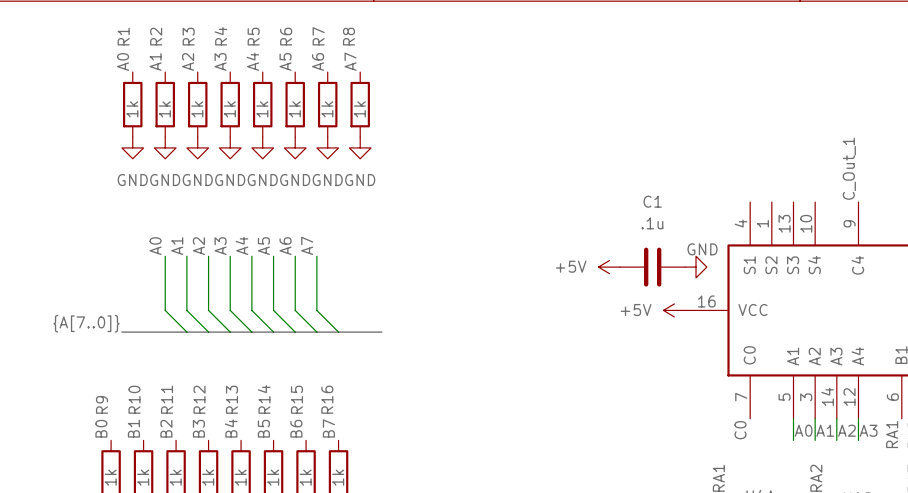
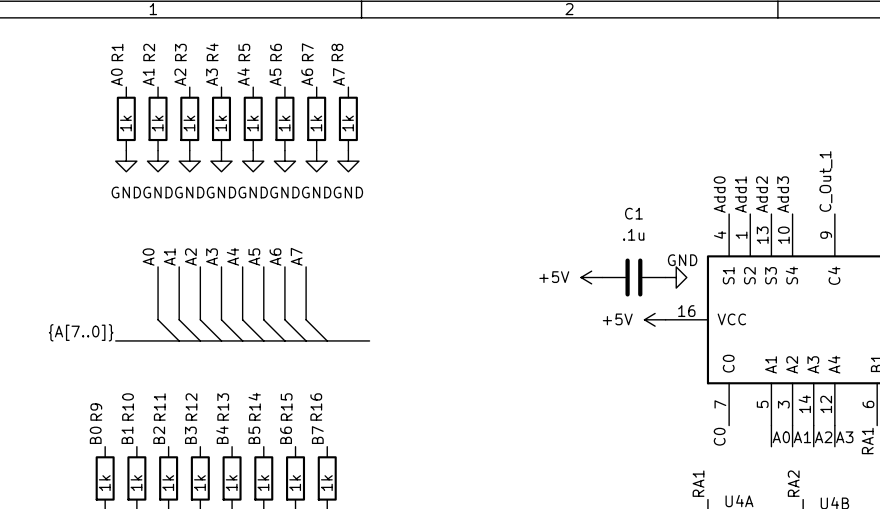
label: none -> Add0 (719, 194)
label: none -> Add1 (740, 194)
label: none -> Add2 (761, 194)
label: none -> Add3 (783, 194)

